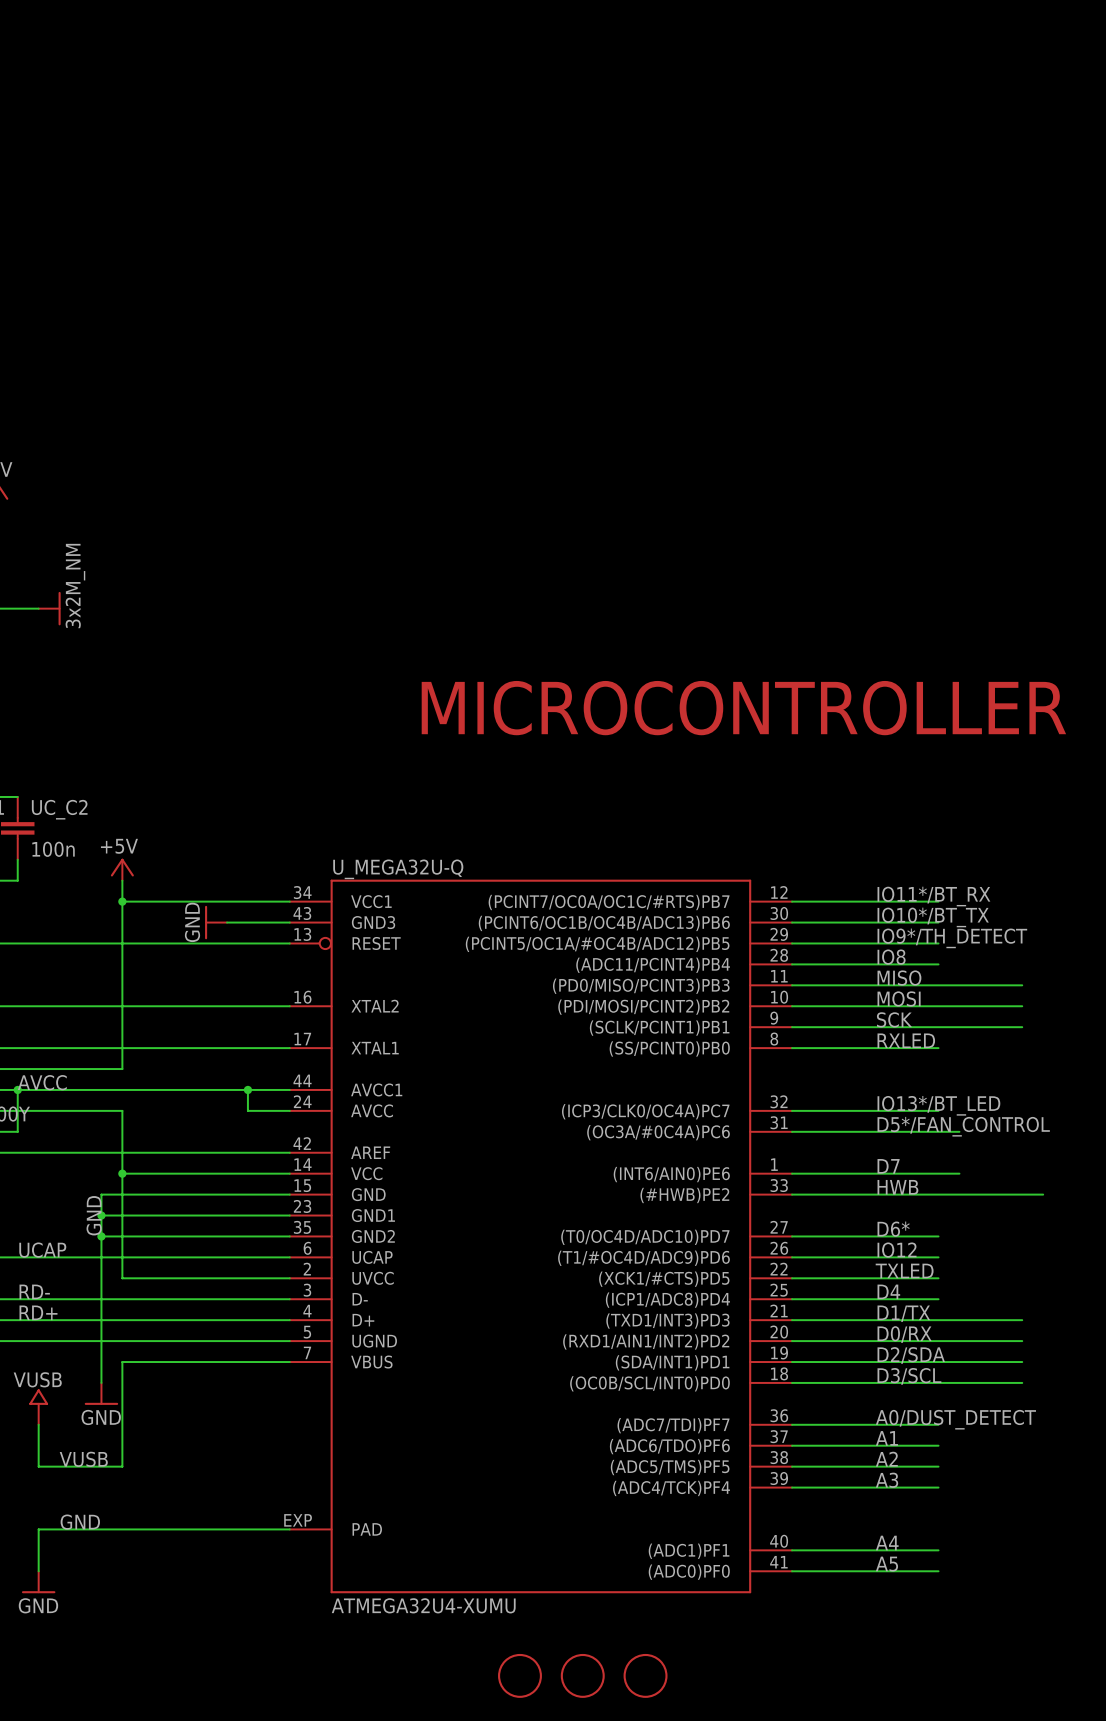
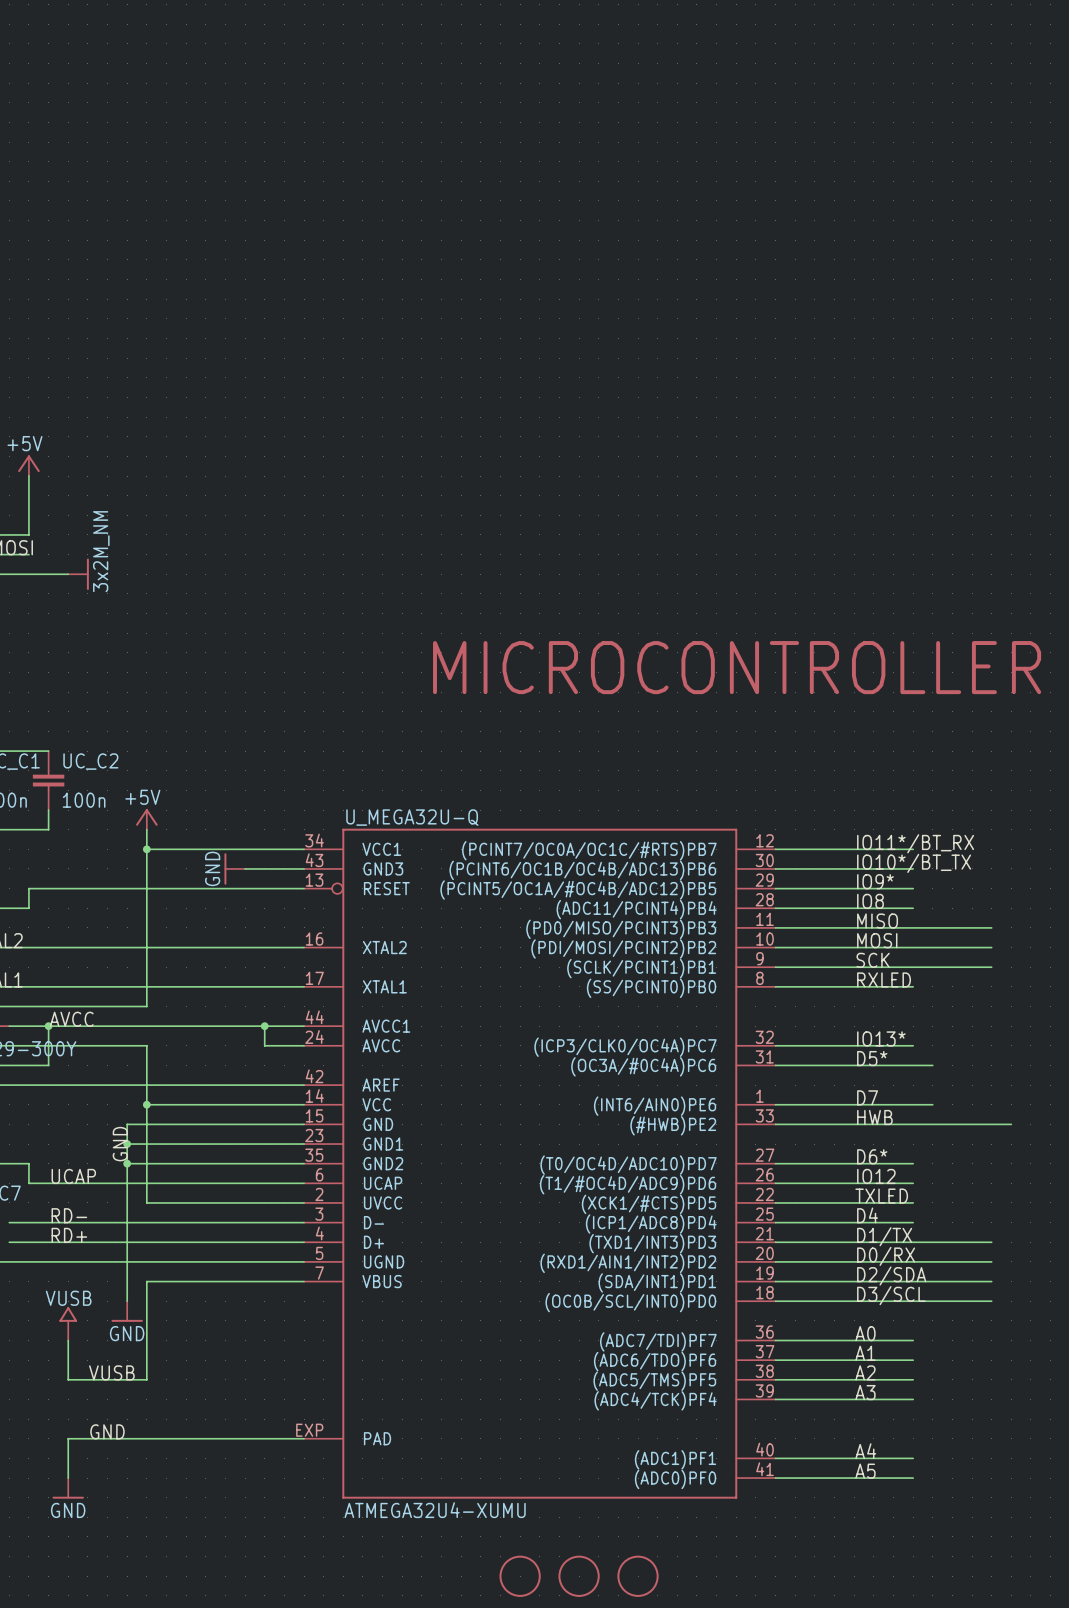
label: IO9*/TH_DETECT (952, 938) -> IO9* (875, 881)
label: IO13*/BT_LED (938, 1105) -> IO13* (881, 1038)
label: D5*/FAN_CONTROL (963, 1126) -> D5* (872, 1058)
label: A0/DUST_DETECT (955, 1419) -> A0 (865, 1333)

